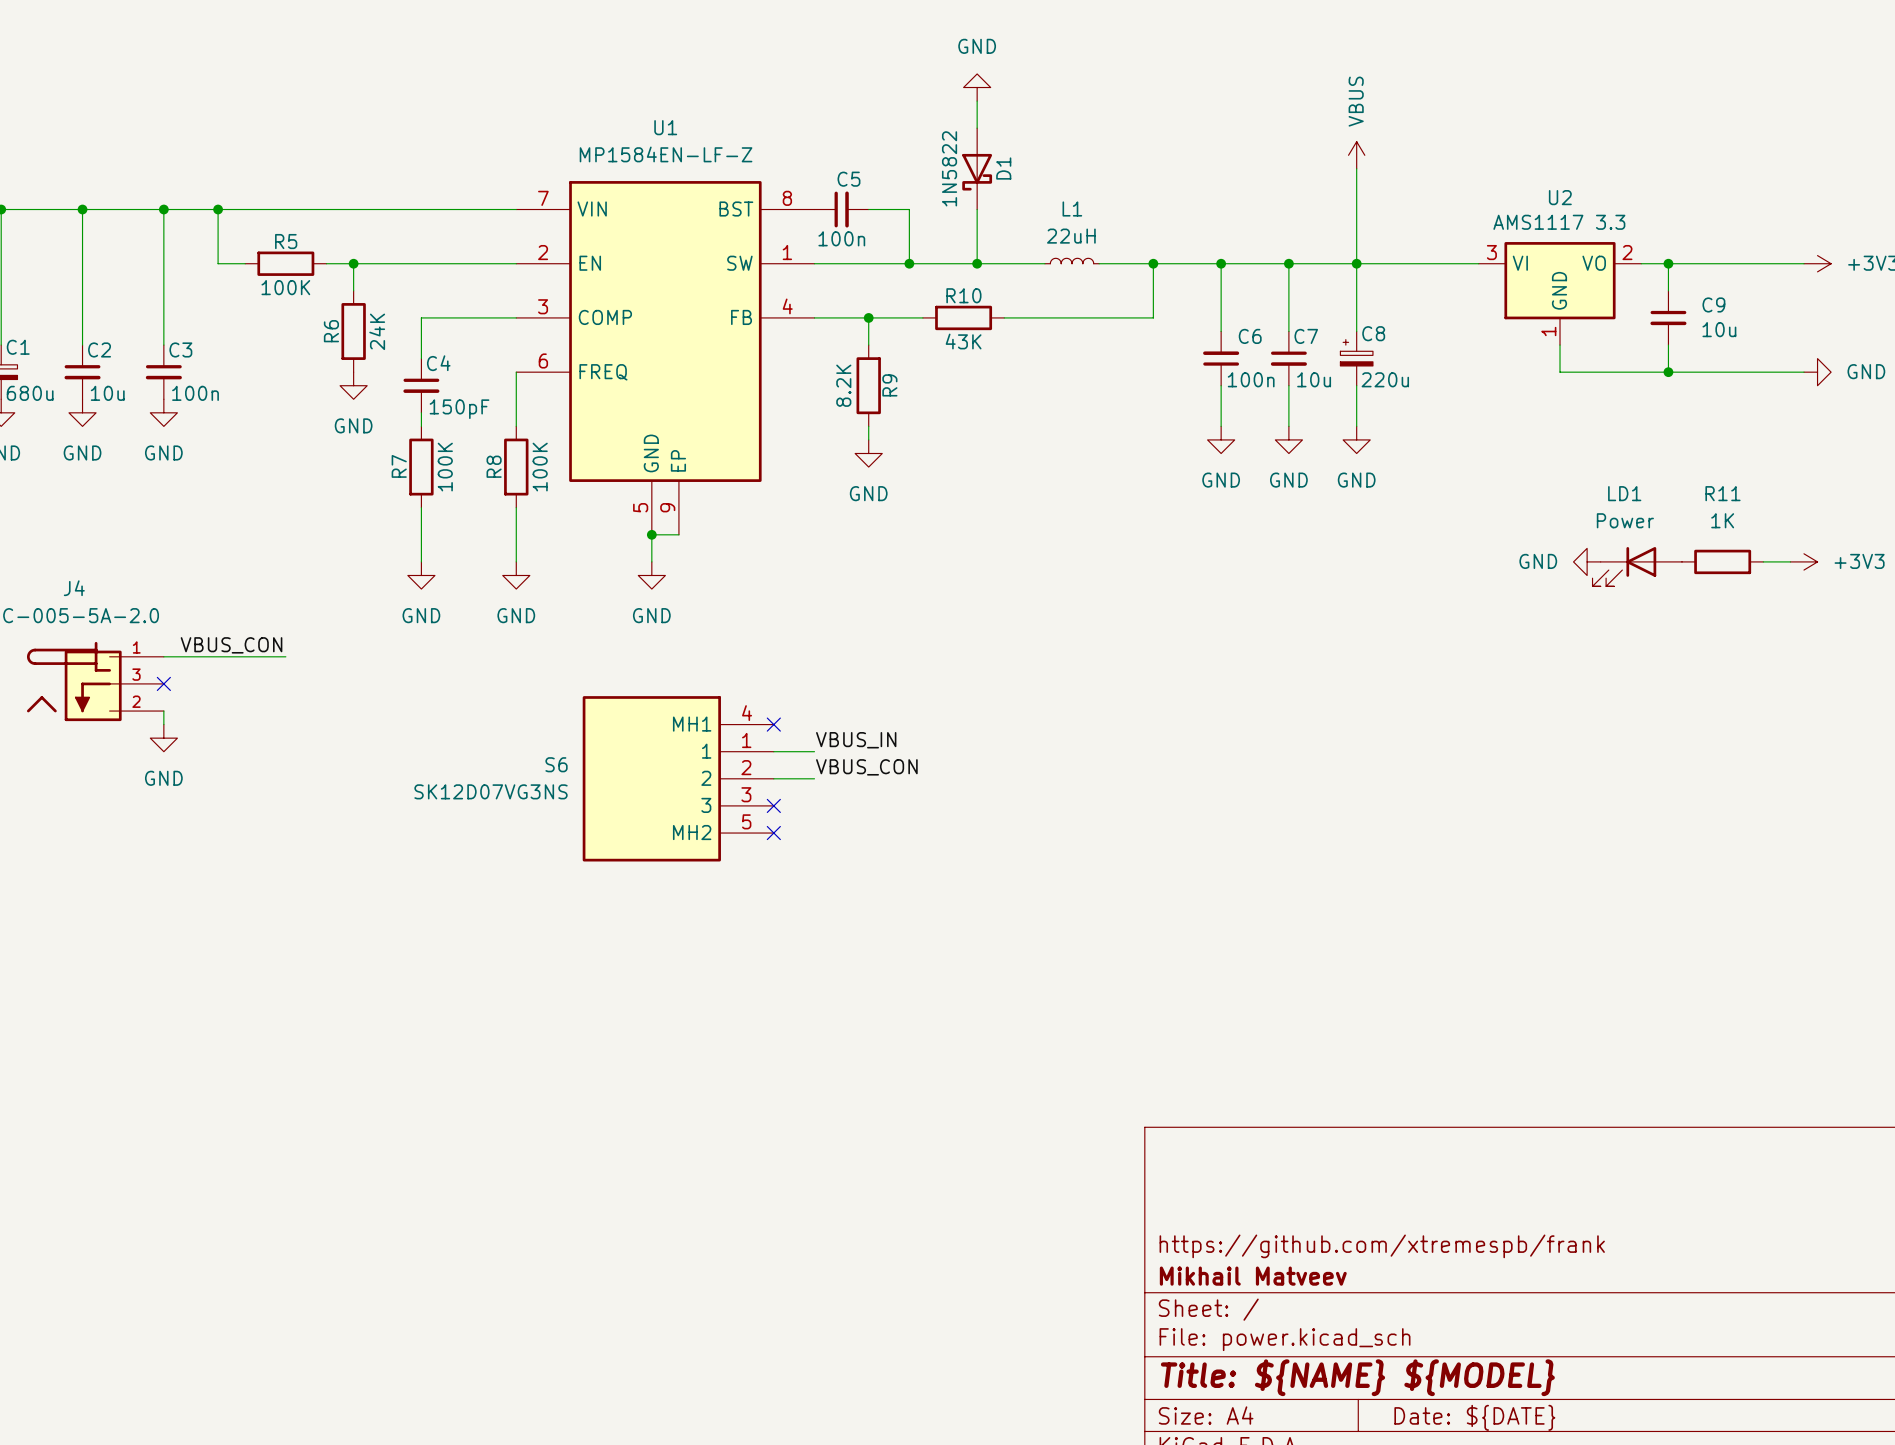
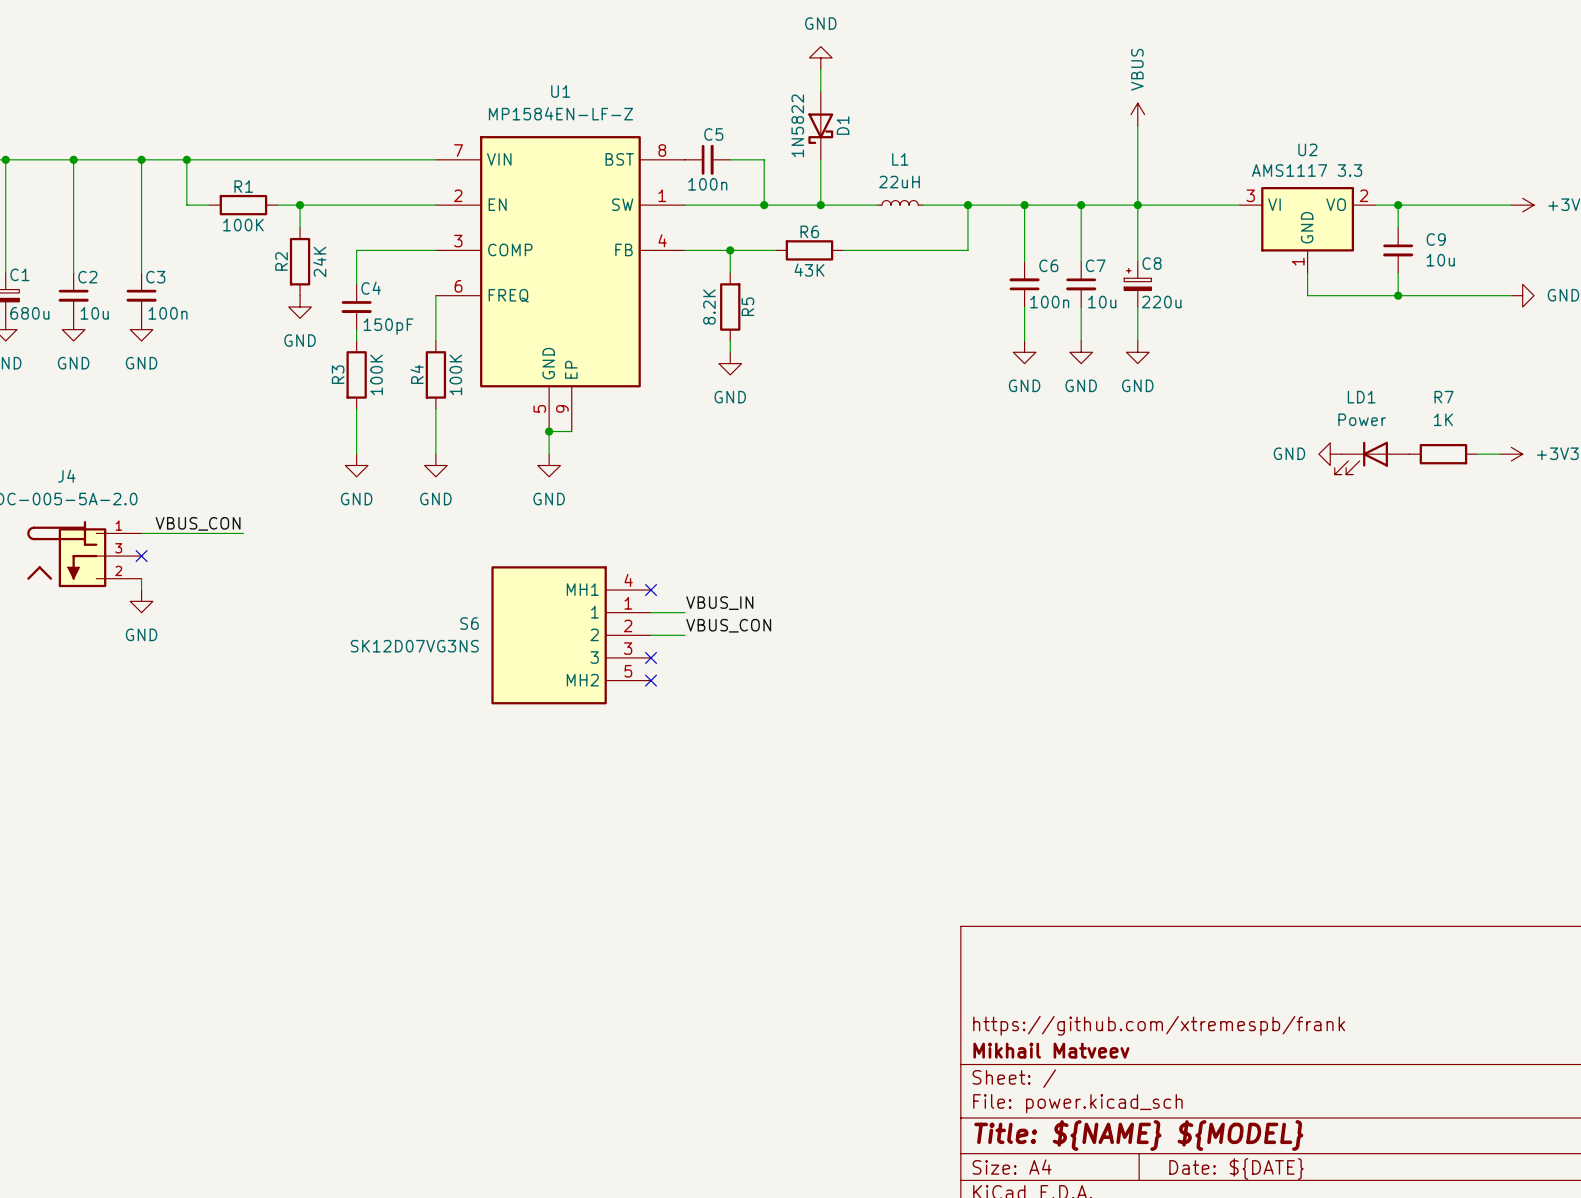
R5 name: R5 (286, 241) -> R1 (243, 186)
R10 name: R10 (963, 295) -> R6 (809, 231)
R6 name: R6 (331, 331) -> R2 (281, 261)
R9 name: R9 (889, 385) -> R5 (747, 306)
R7 name: R7 (399, 466) -> R3 (338, 374)
R8 name: R8 (494, 466) -> R4 (417, 374)
R11 name: R11 (1722, 493) -> R7 (1443, 397)

